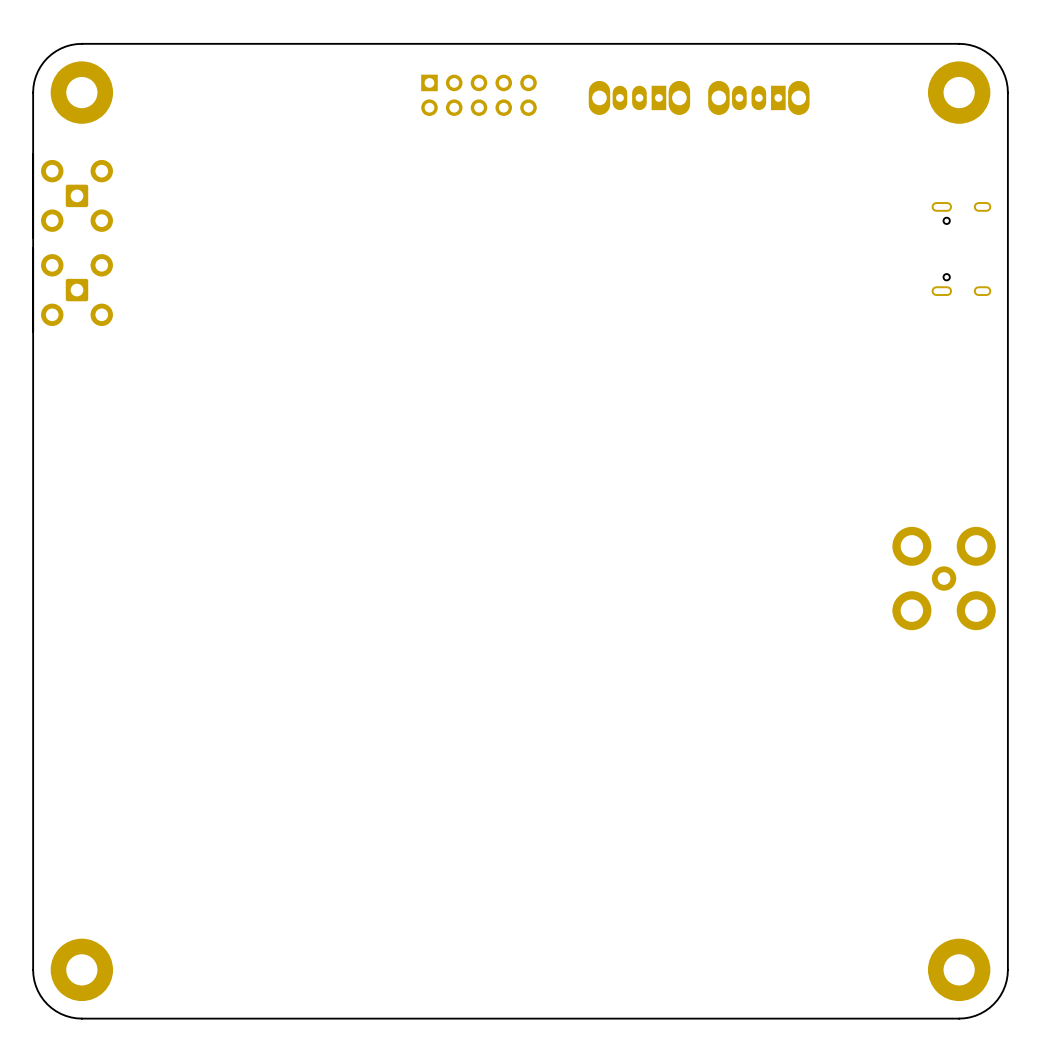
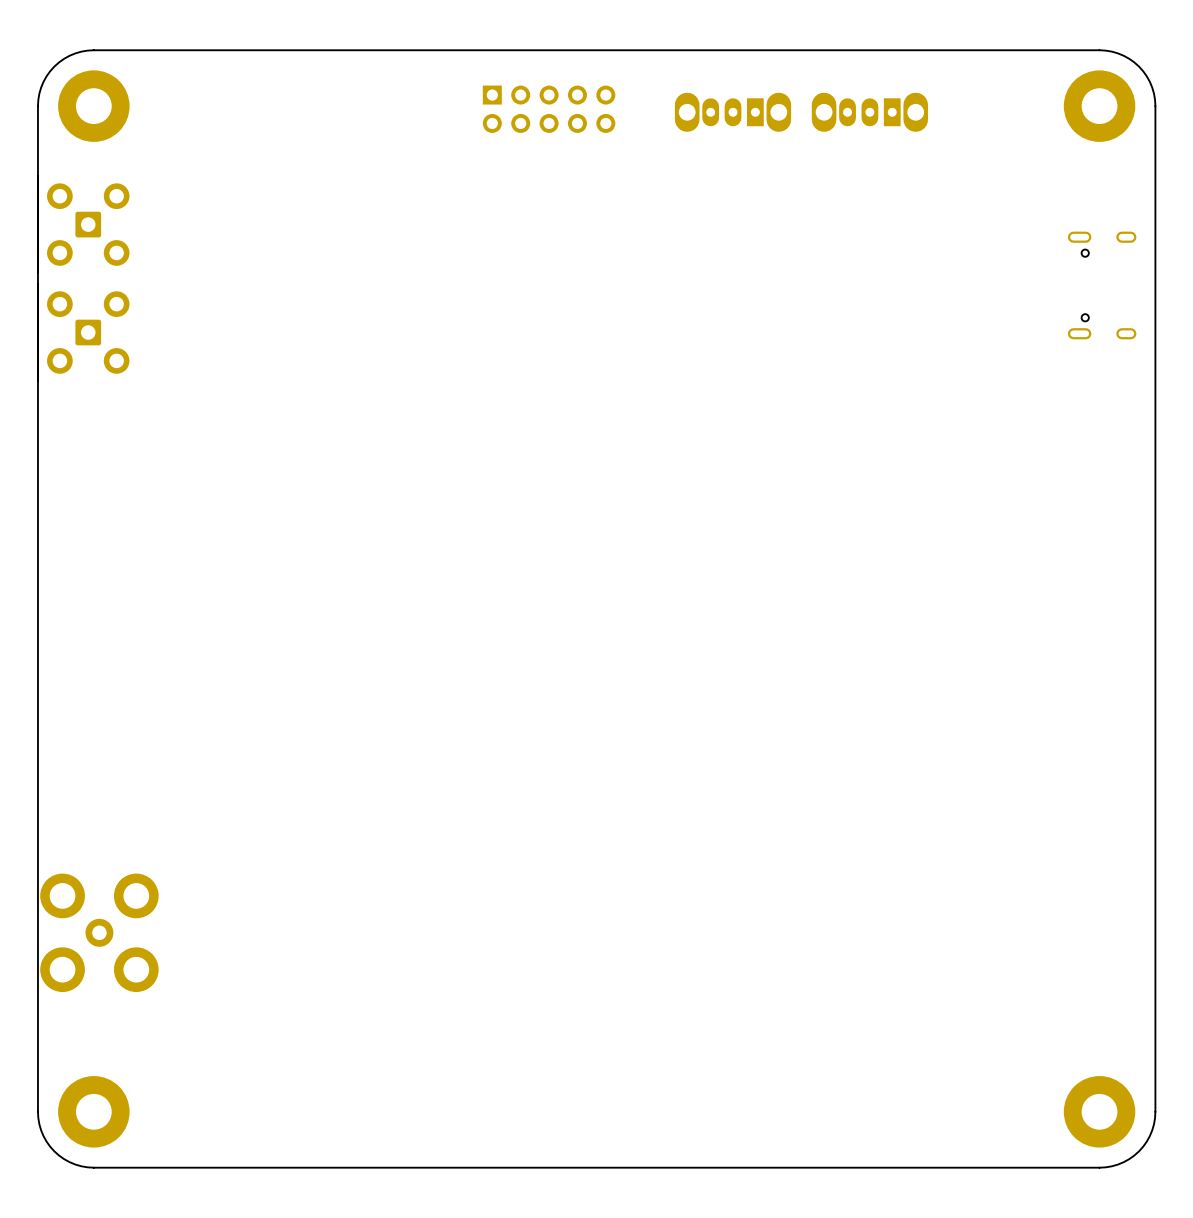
part: (944, 578) -> none
part: none -> (99, 932)

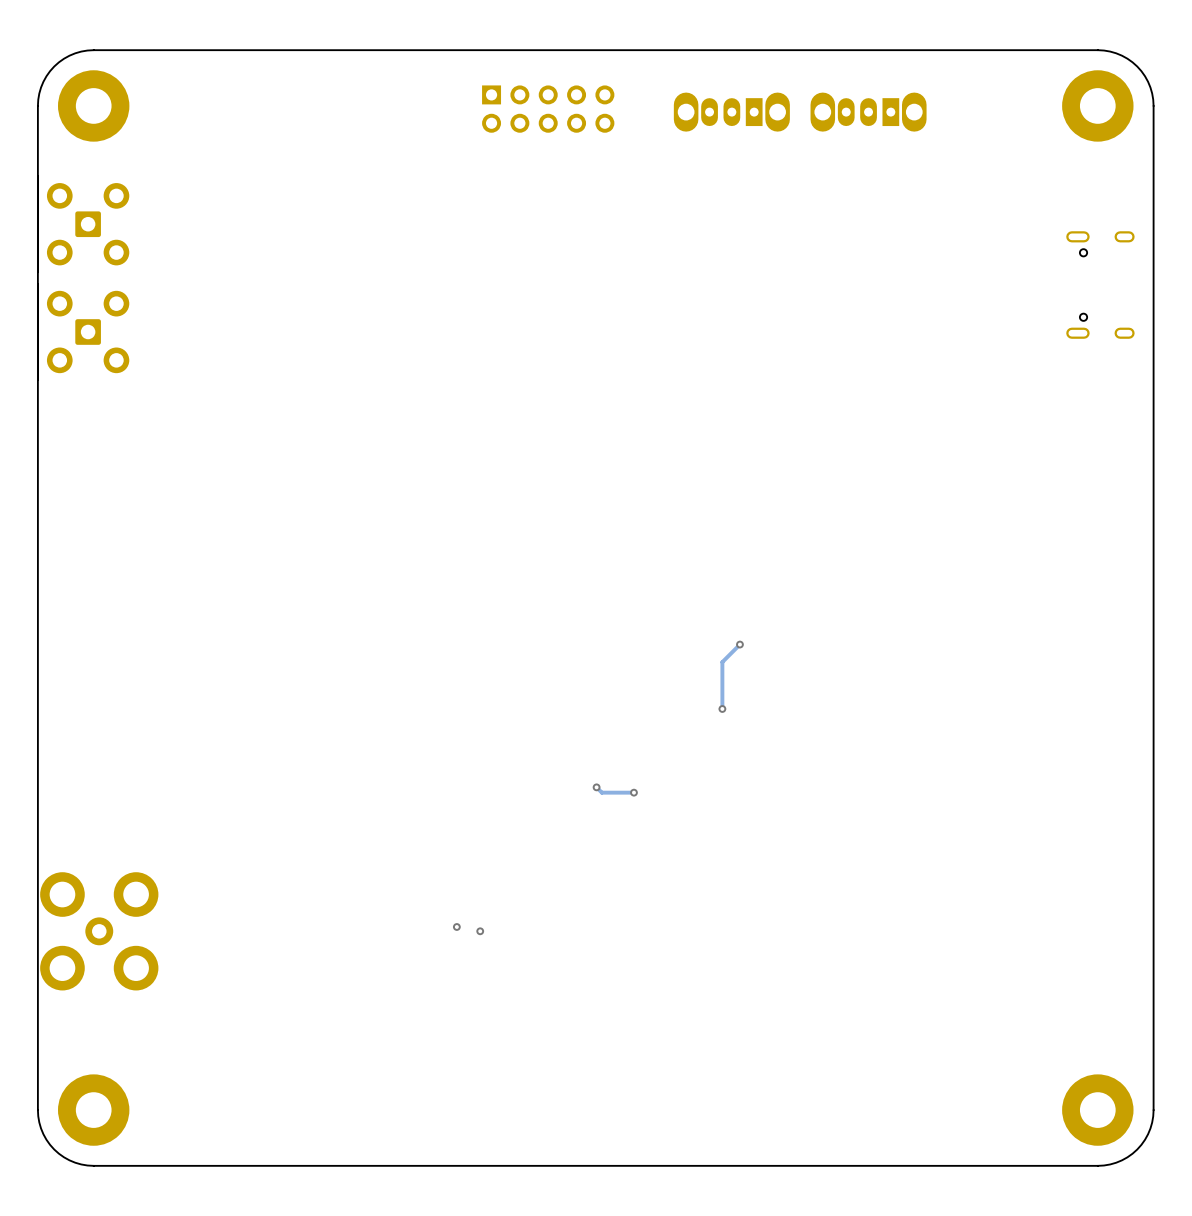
track: none -> (739, 644) (722, 662) (722, 708)
via: none -> (739, 644)
via: none -> (722, 708)
track: none -> (596, 787) (601, 792) (633, 792)
via: none -> (596, 787)
via: none -> (633, 792)
via: none -> (456, 926)
via: none -> (480, 931)

